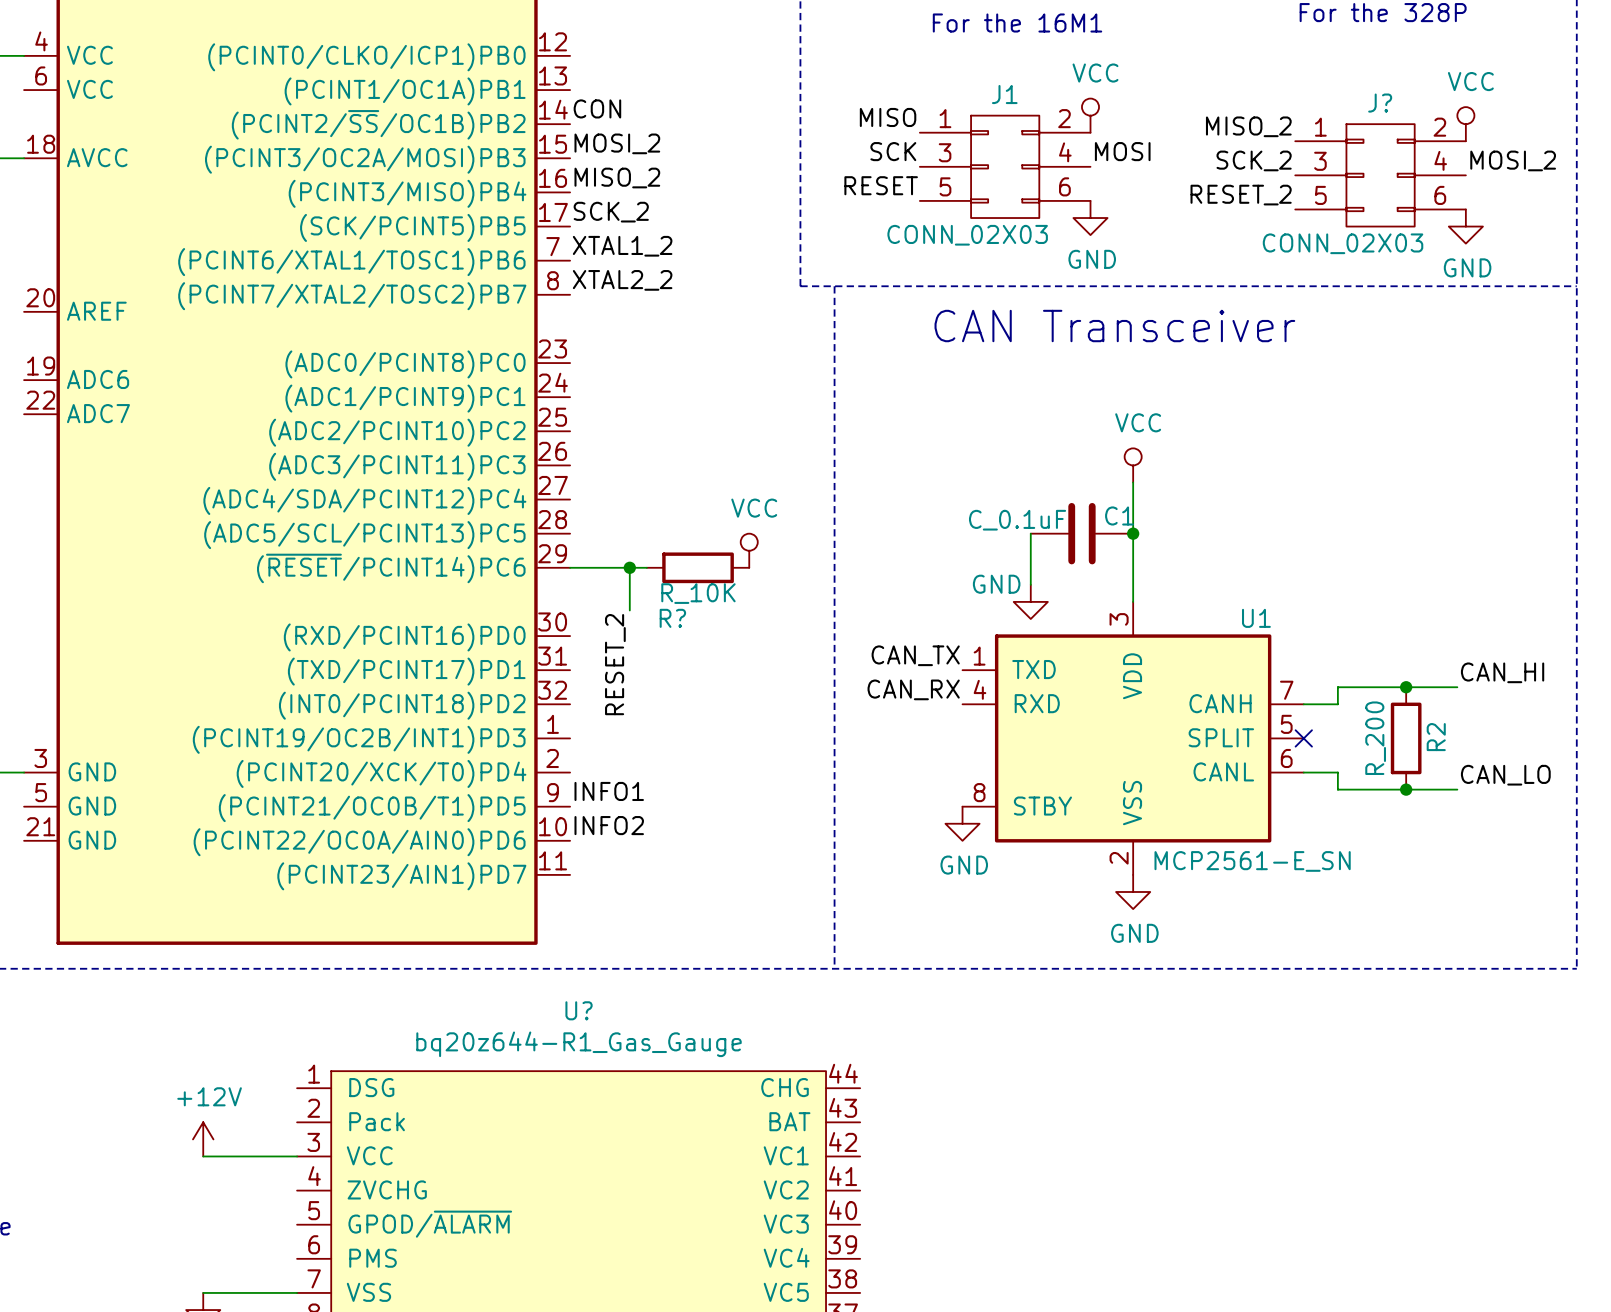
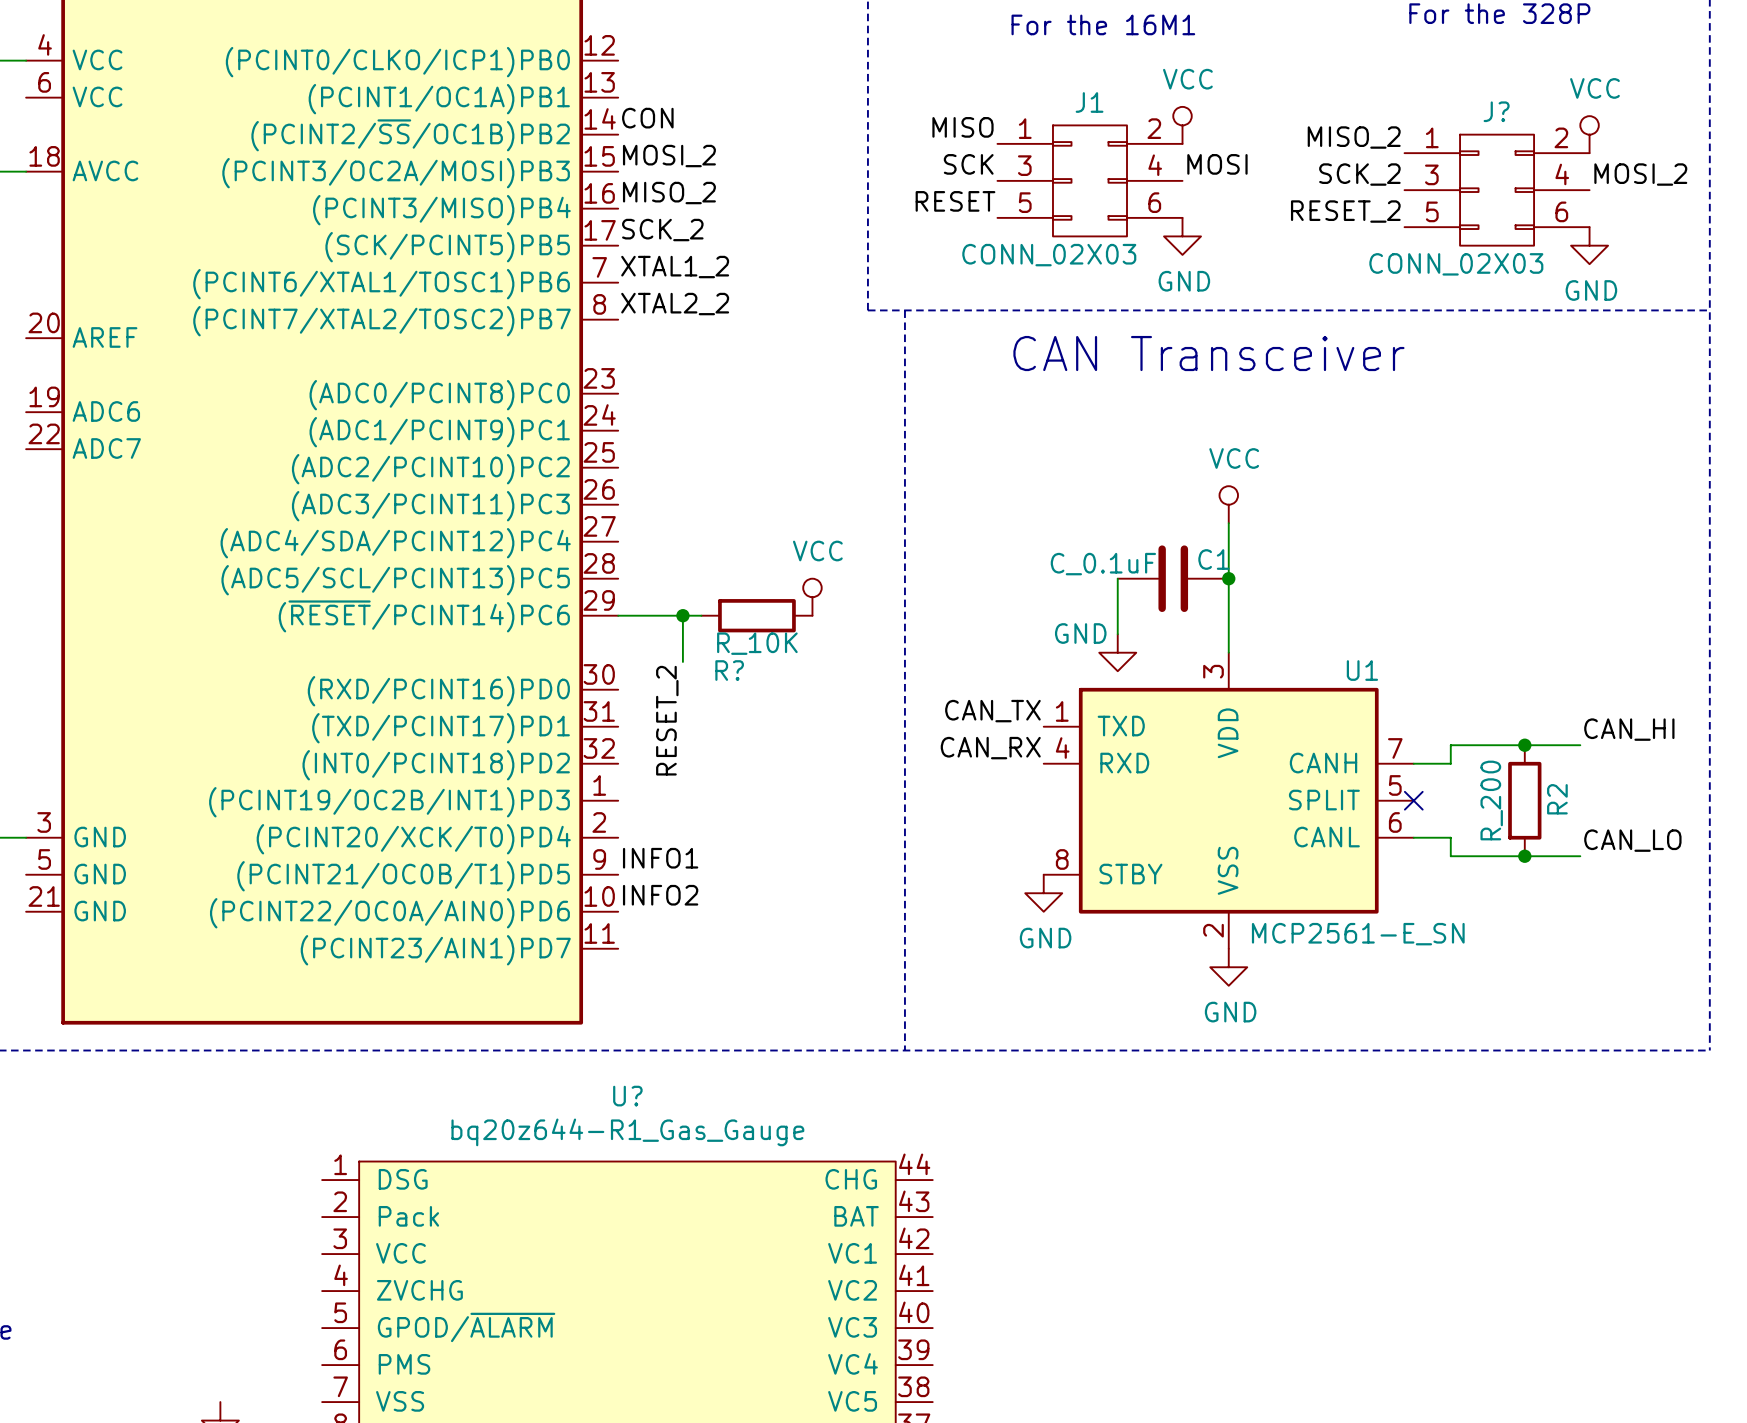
power symbol: +12V (203, 1139) -> none
wire: (203, 1156) (297, 1156) -> none
wire: (203, 1292) (297, 1292) -> none

